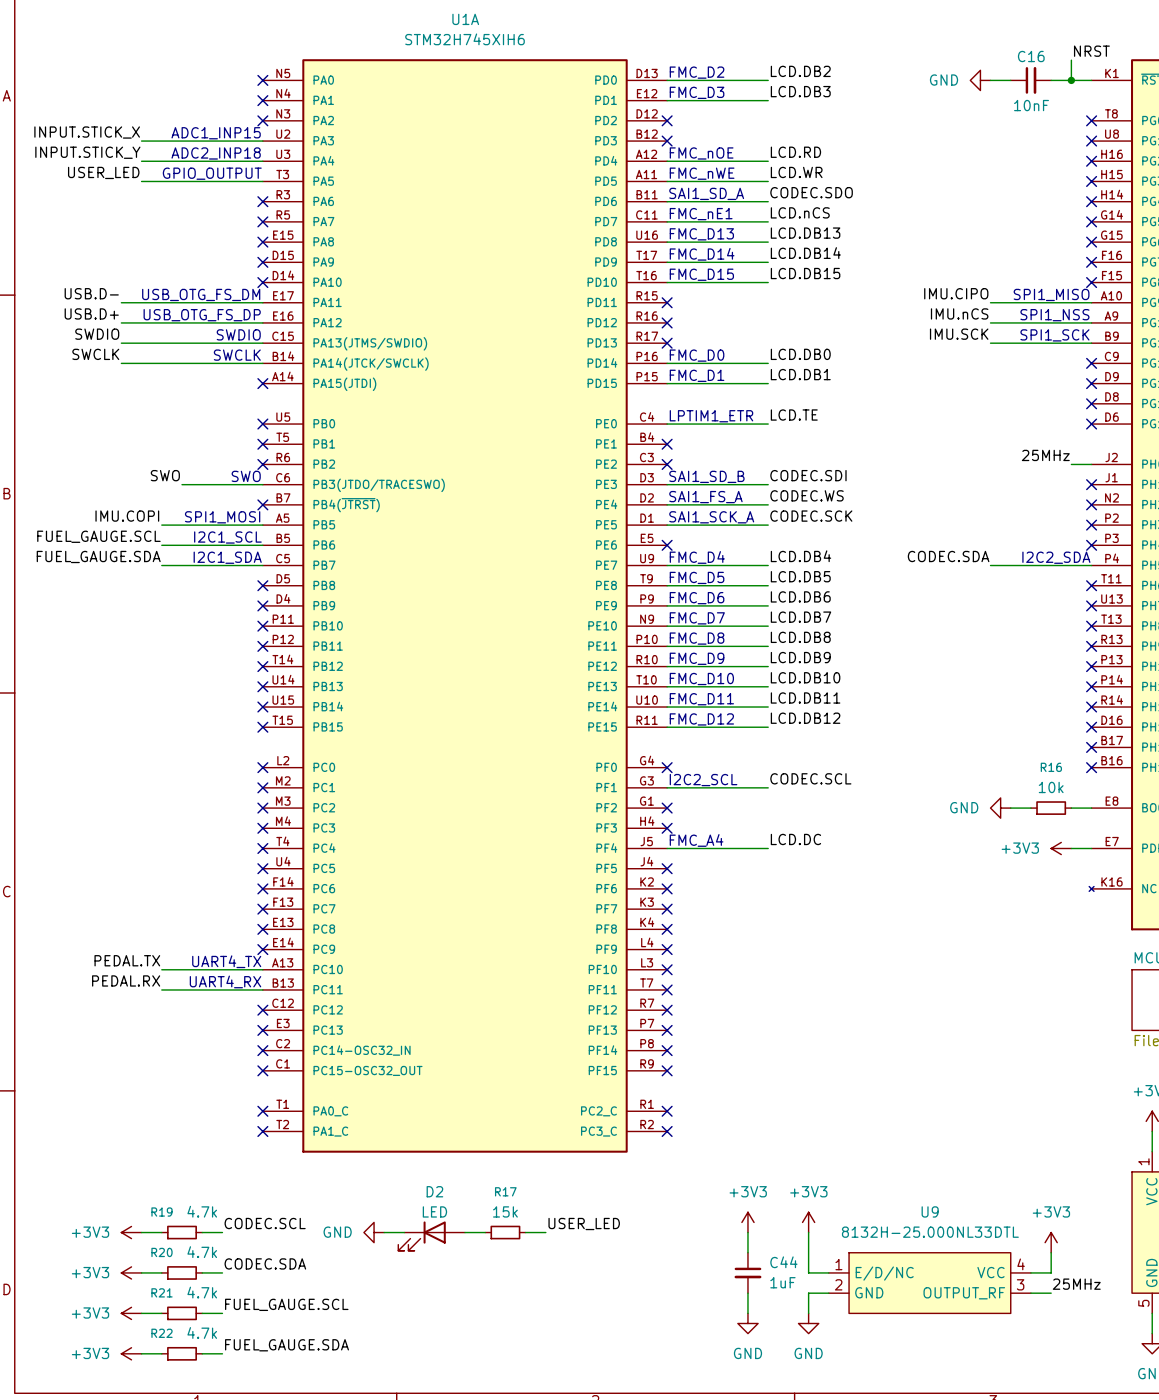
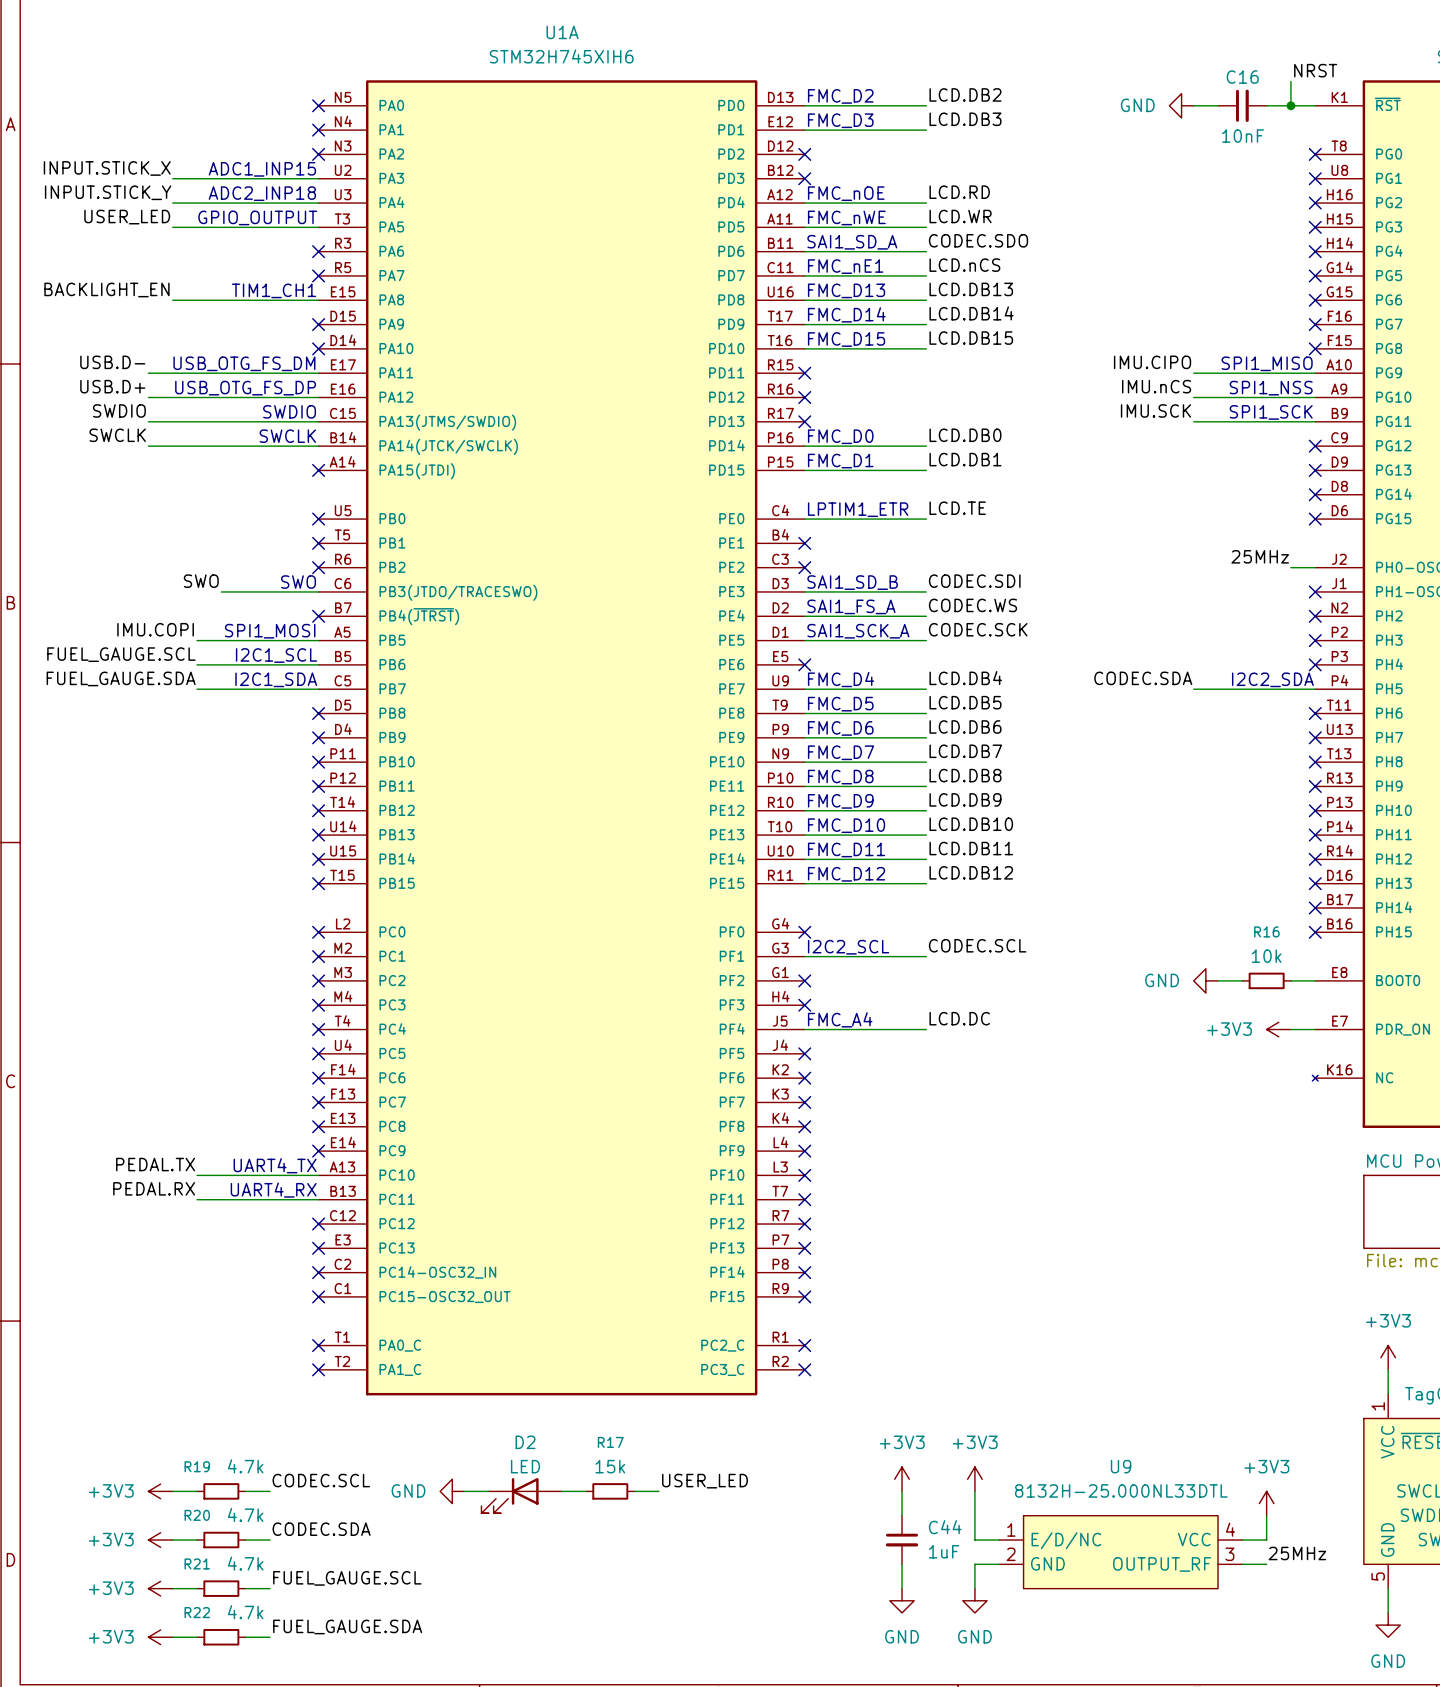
label: none -> BACKLIGHT_EN (106, 290)
text: none -> TIM1_CH1 (273, 290)
wire: none -> (172, 300) (318, 300)
no-connect mark: (262, 242) -> none

